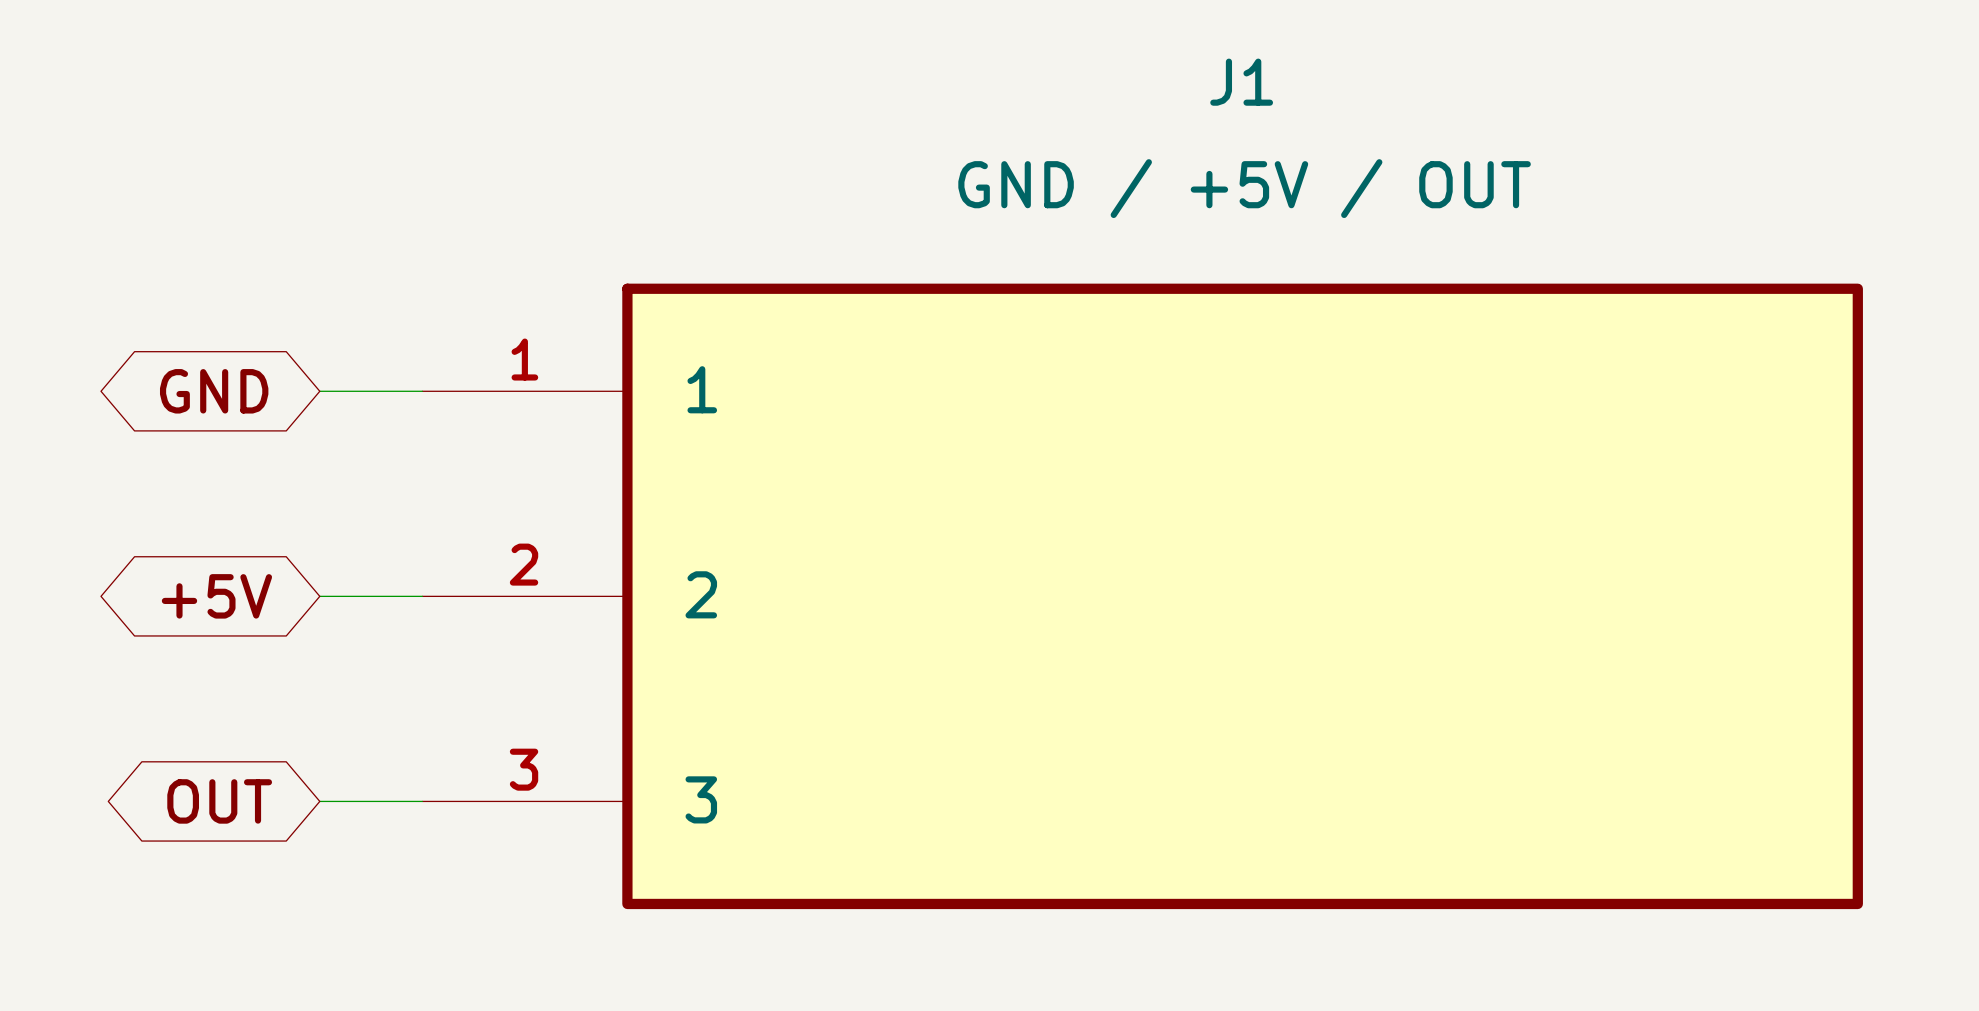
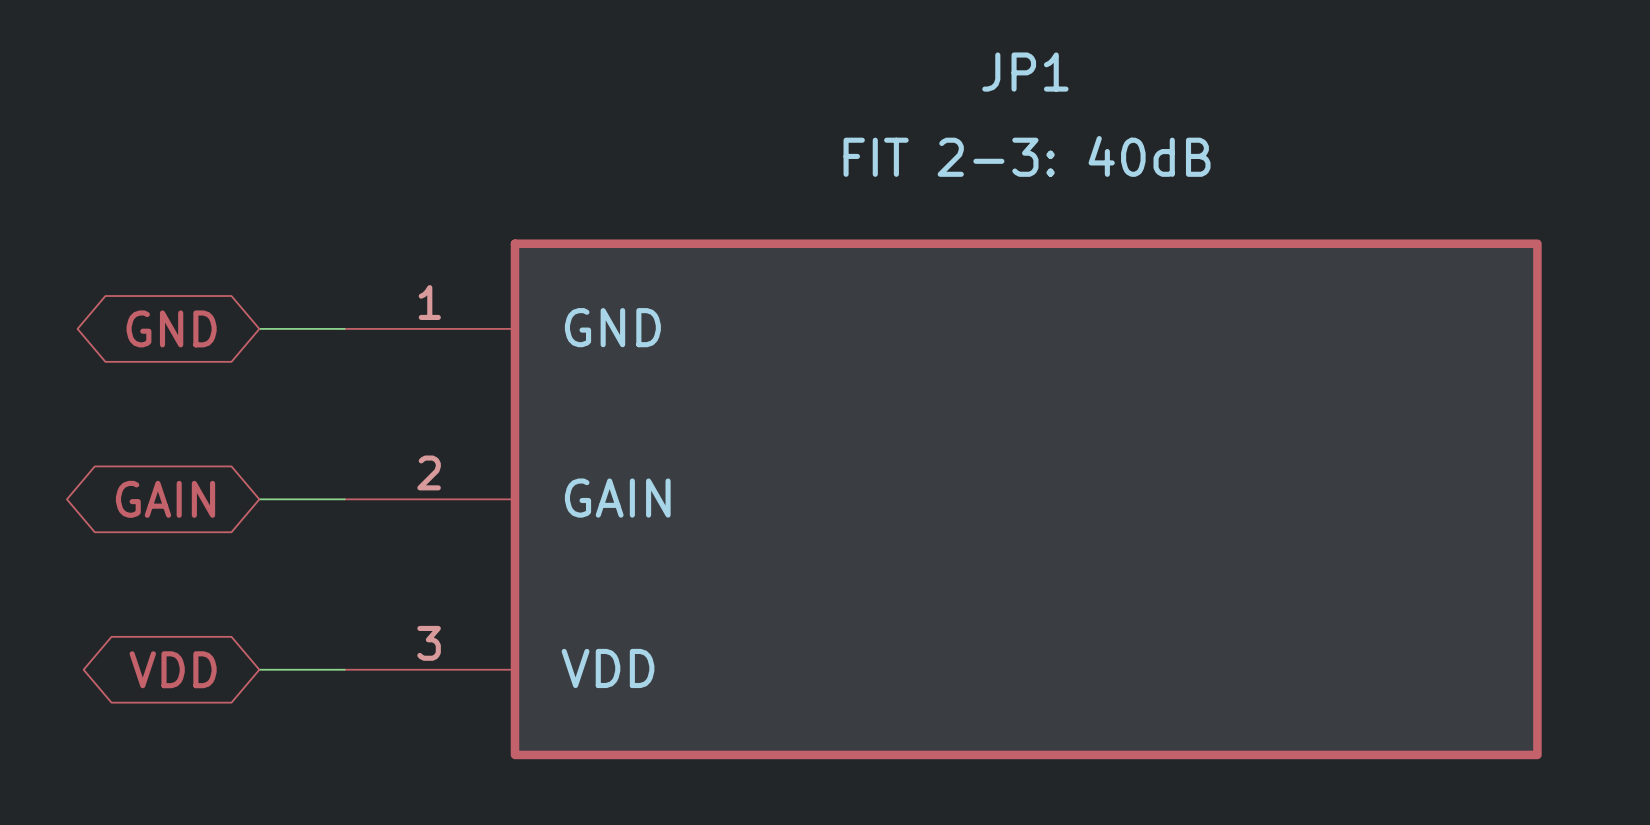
J1 name: J1 (1241, 82) -> JP1 (1025, 72)
J1 value: GND / +5V / OUT (1244, 188) -> FIT 2-3: 40dB (1027, 156)
J1 pin name: 1 (702, 389) -> GND (612, 327)
J1 pin name: 2 (701, 594) -> GAIN (617, 498)
global label: +5V (216, 596) -> GAIN (165, 499)
J1 pin name: 3 (701, 799) -> VDD (608, 668)
global label: OUT (219, 801) -> VDD (173, 669)

